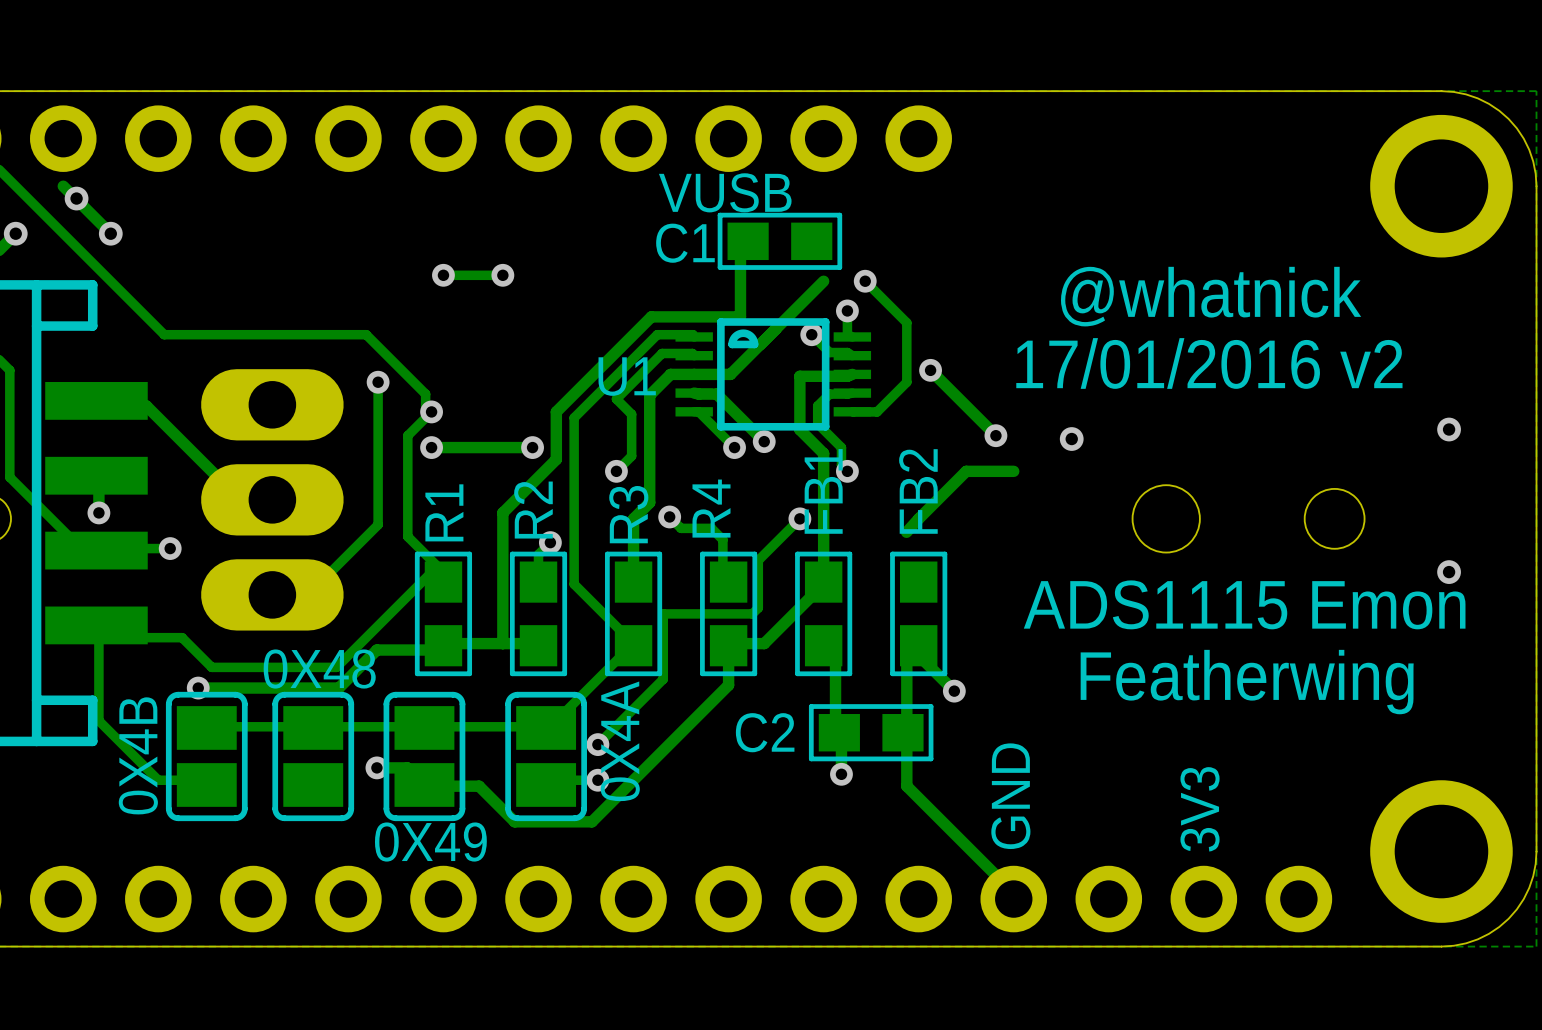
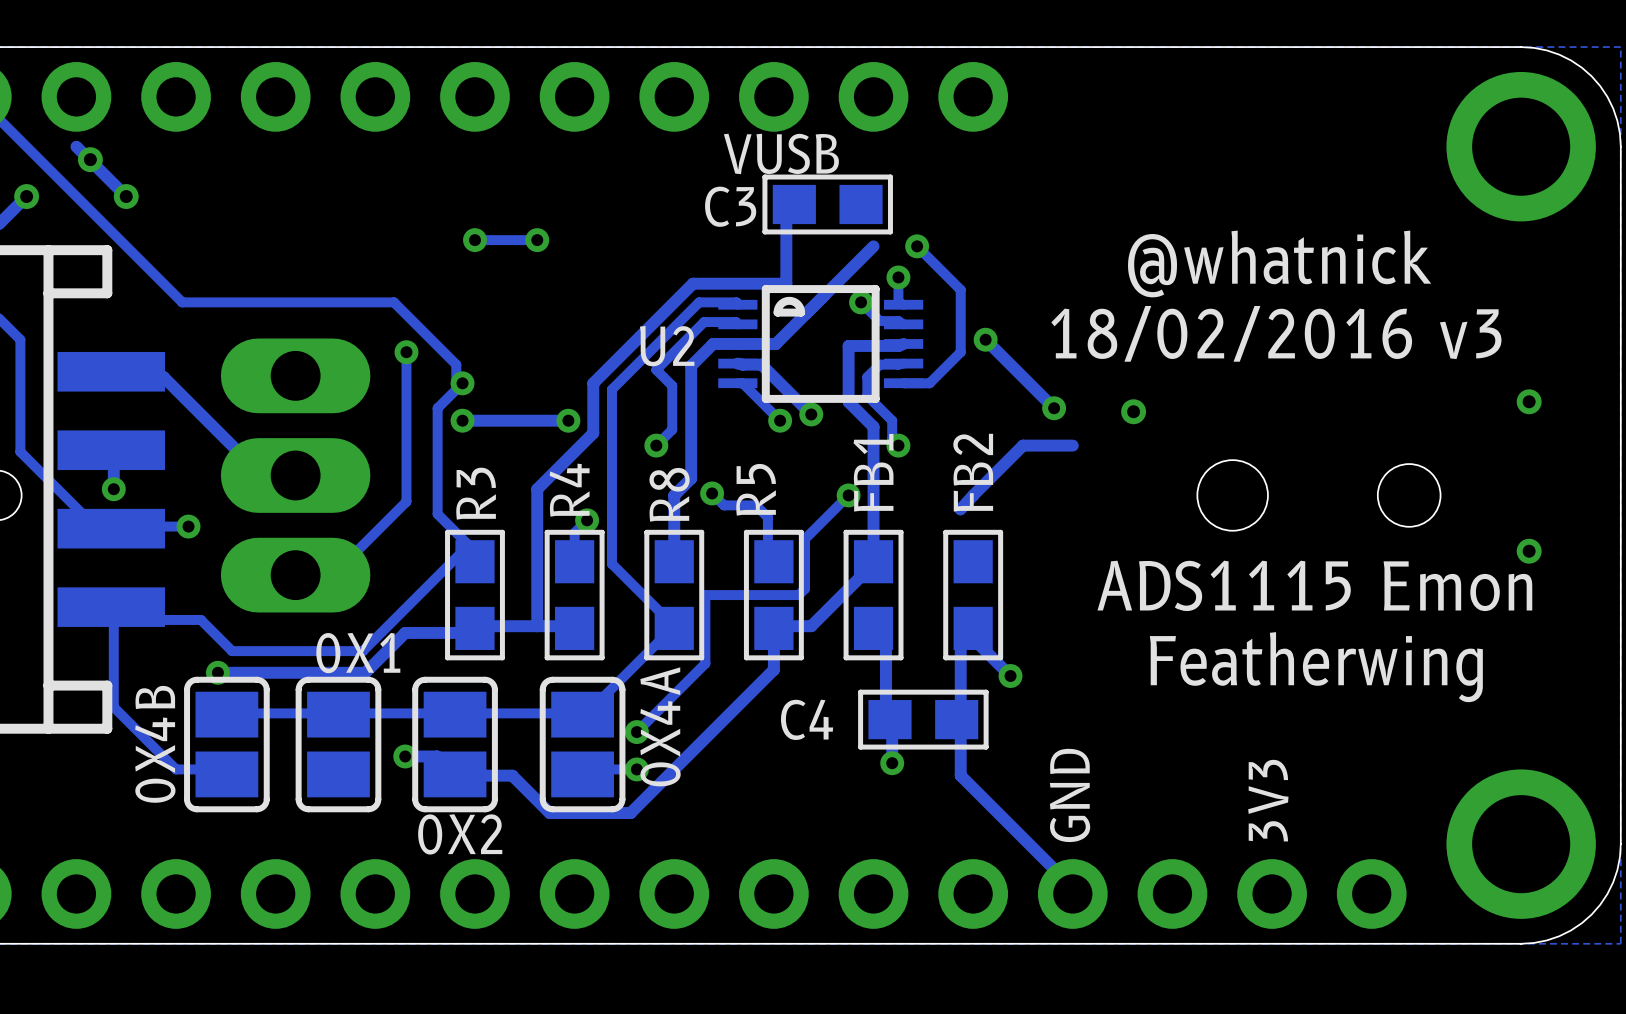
C1 name: C1 (685, 243) -> C3 (730, 206)
text: 17/01/2016 v2 (1209, 363) -> 18/02/2016 v3 (1276, 333)
U1 name: U1 (627, 376) -> U2 (667, 346)
R4 name: R4 (711, 508) -> R5 (756, 489)
R2 name: R2 (533, 510) -> R4 (569, 490)
R1 name: R1 (444, 512) -> R3 (476, 493)
R3 name: R3 (628, 514) -> R8 (669, 494)
0X48 name: 0X48 (319, 669) -> 0X1 (358, 653)
C2 name: C2 (765, 732) -> C4 (807, 719)
0X49 name: 0X49 (430, 842) -> 0X2 (460, 834)

